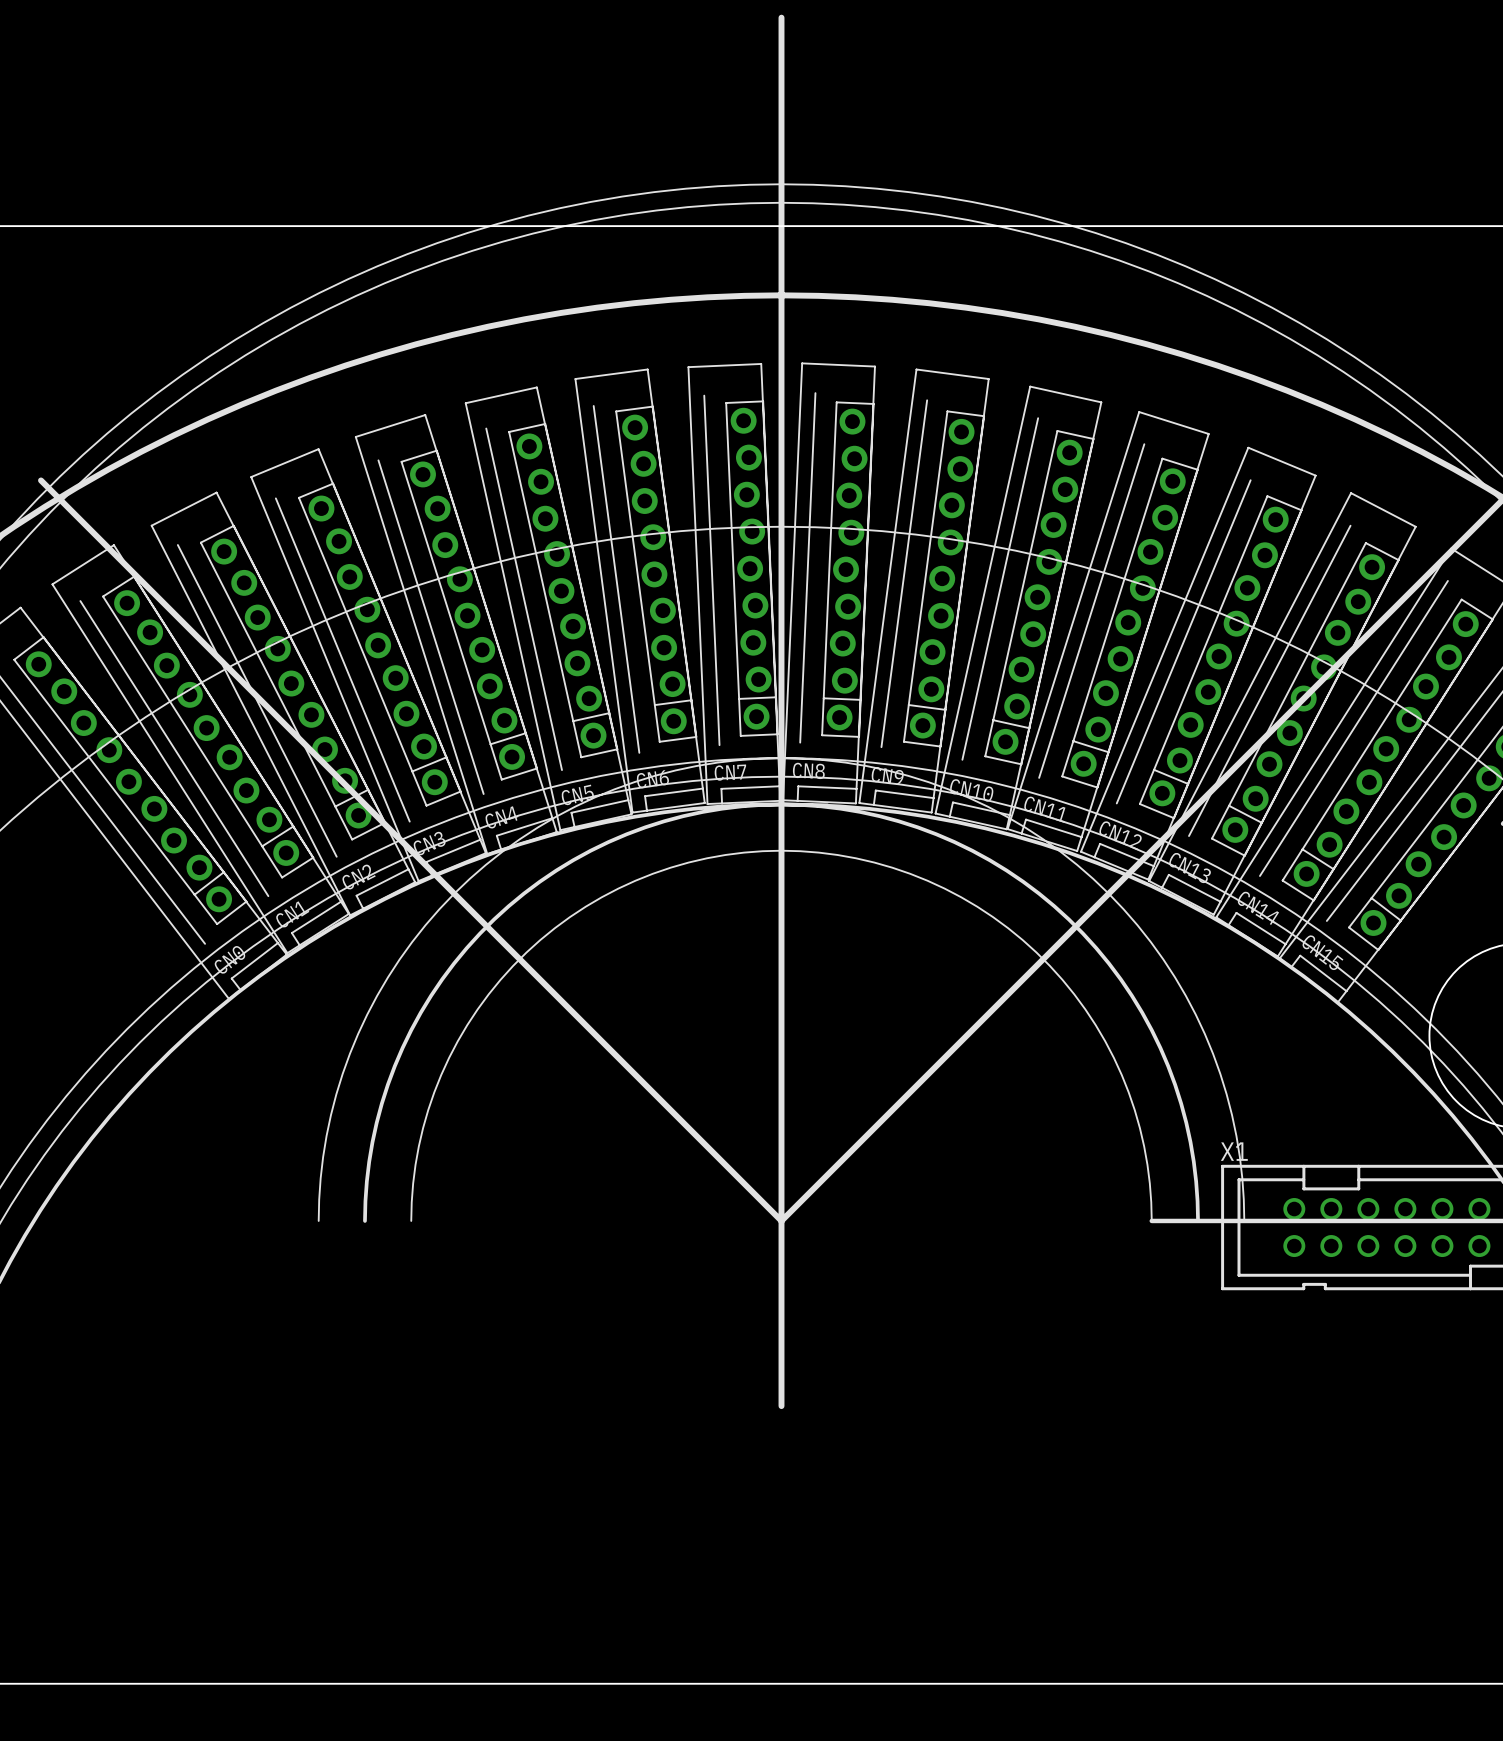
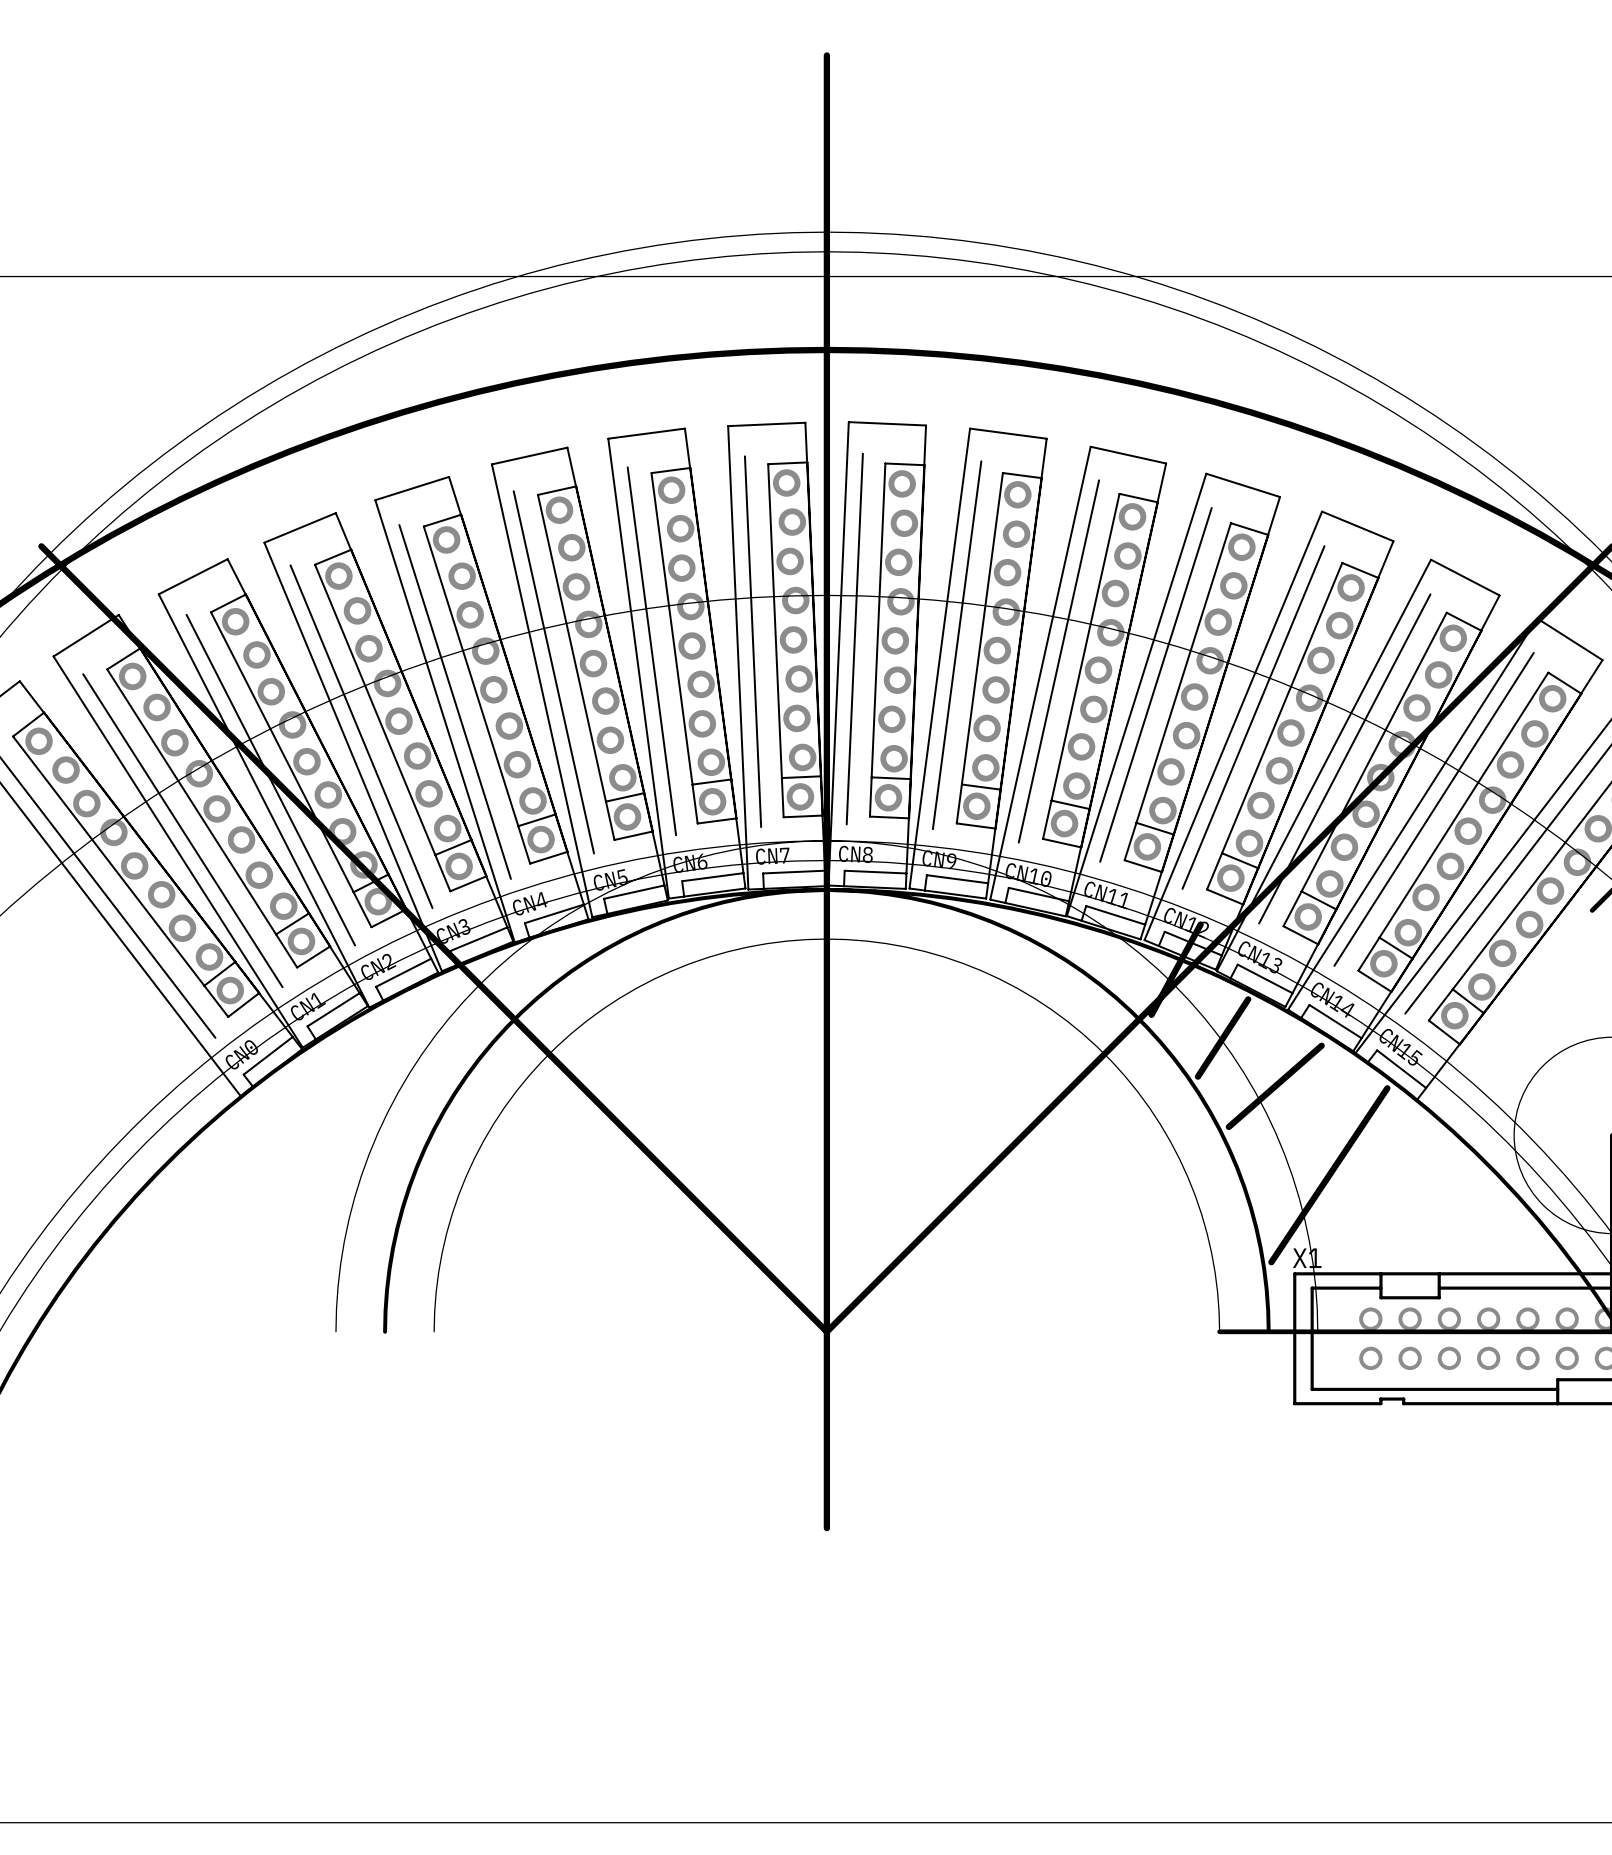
line: none -> (1200, 924) (1151, 1014)
line: none -> (1248, 999) (1197, 1076)
line: none -> (1321, 1045) (1228, 1126)
line: none -> (1387, 1088) (1271, 1262)

